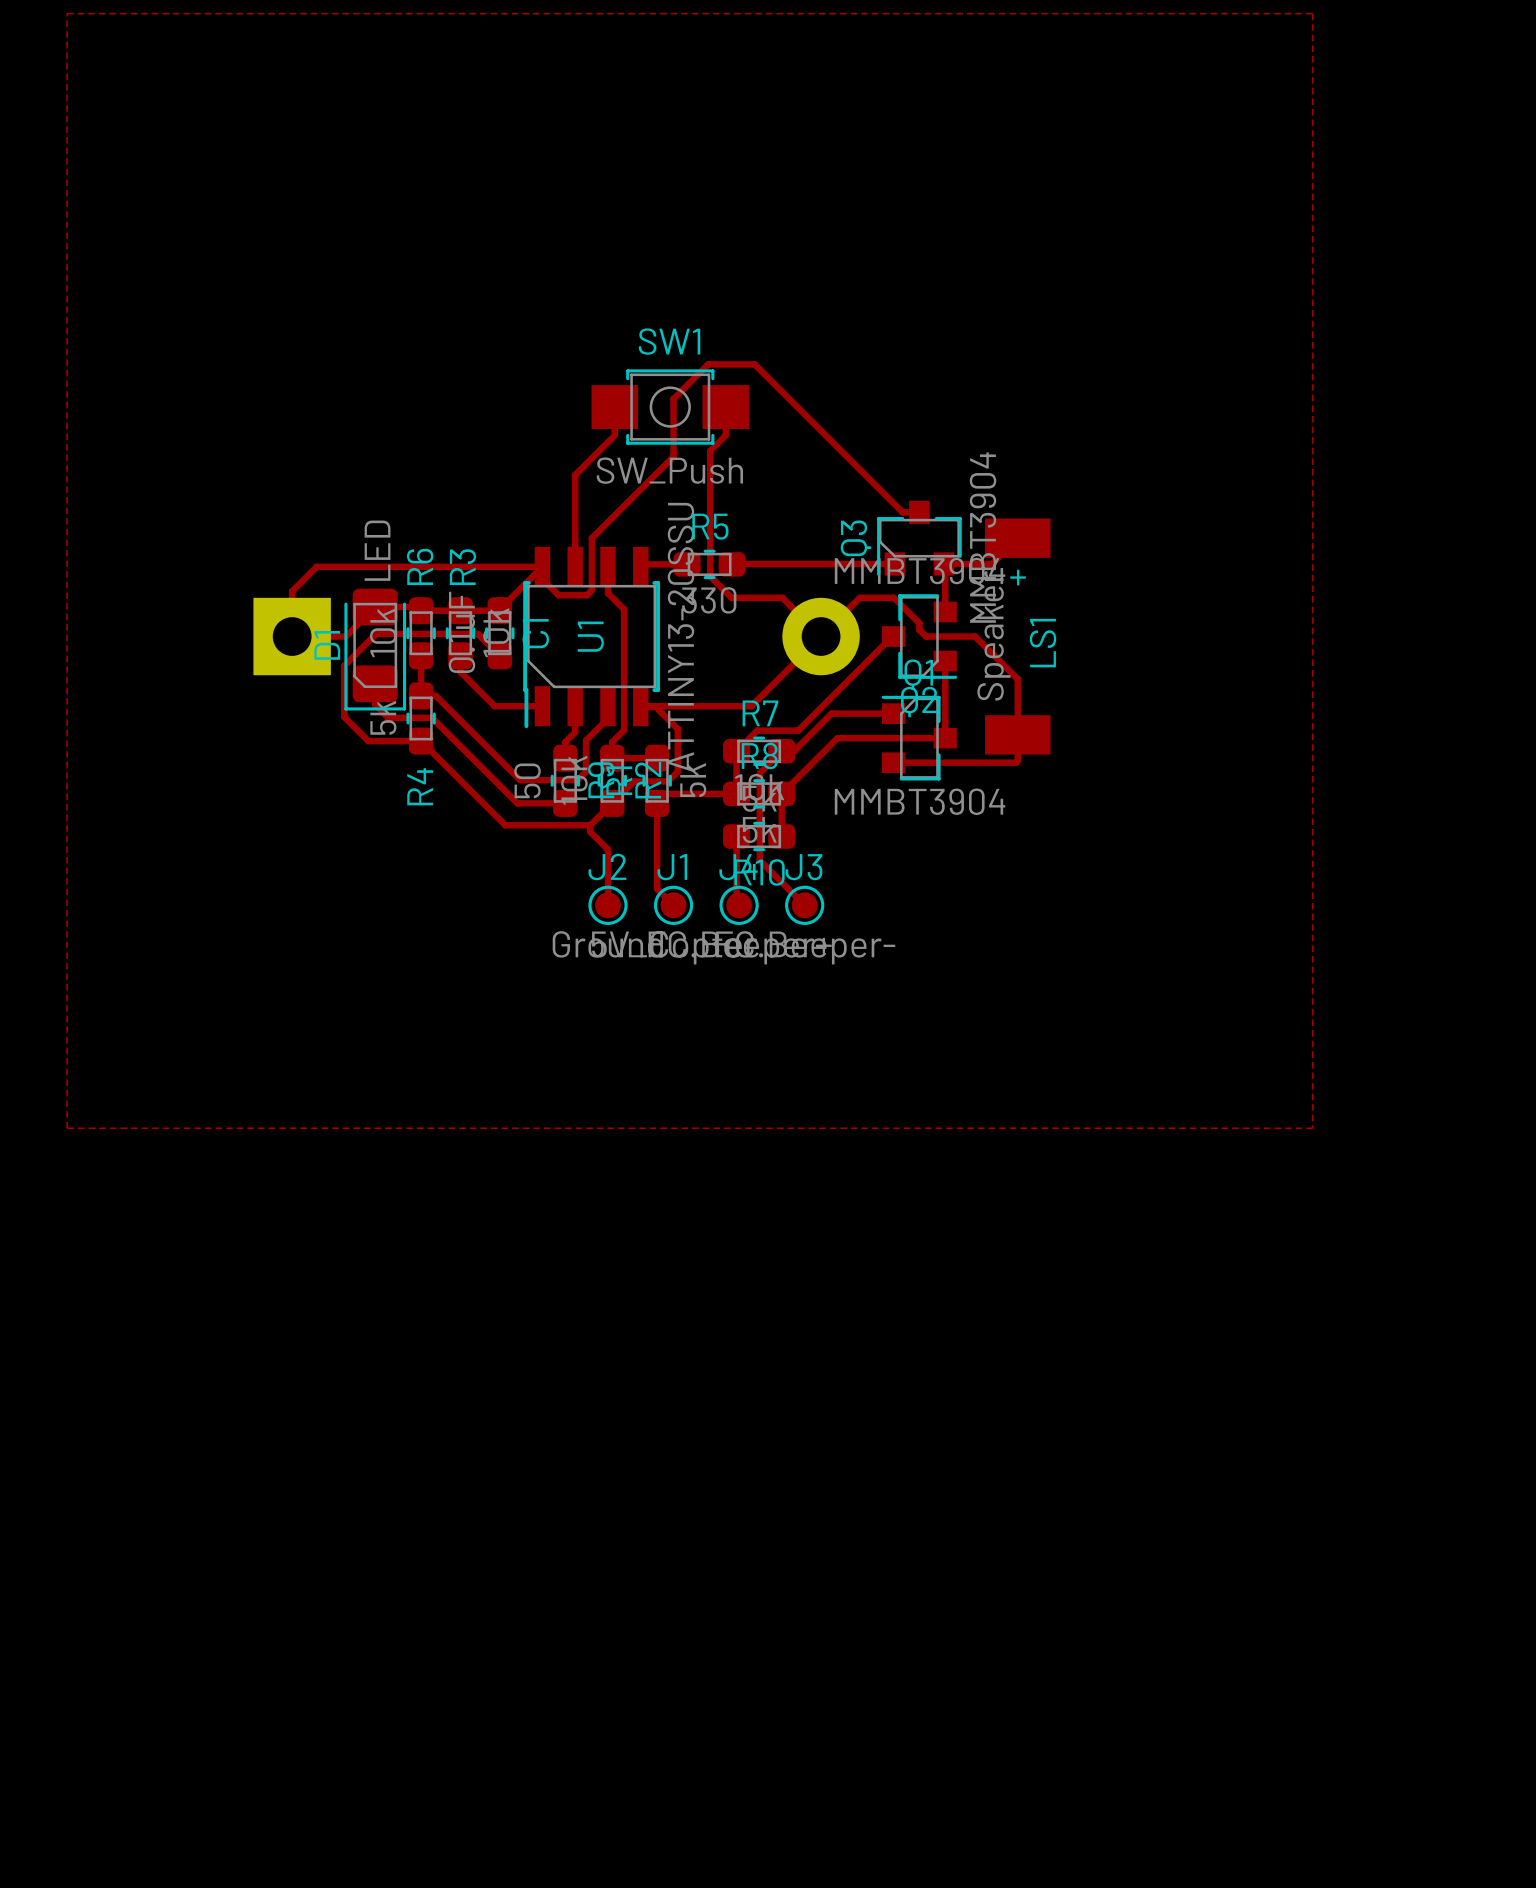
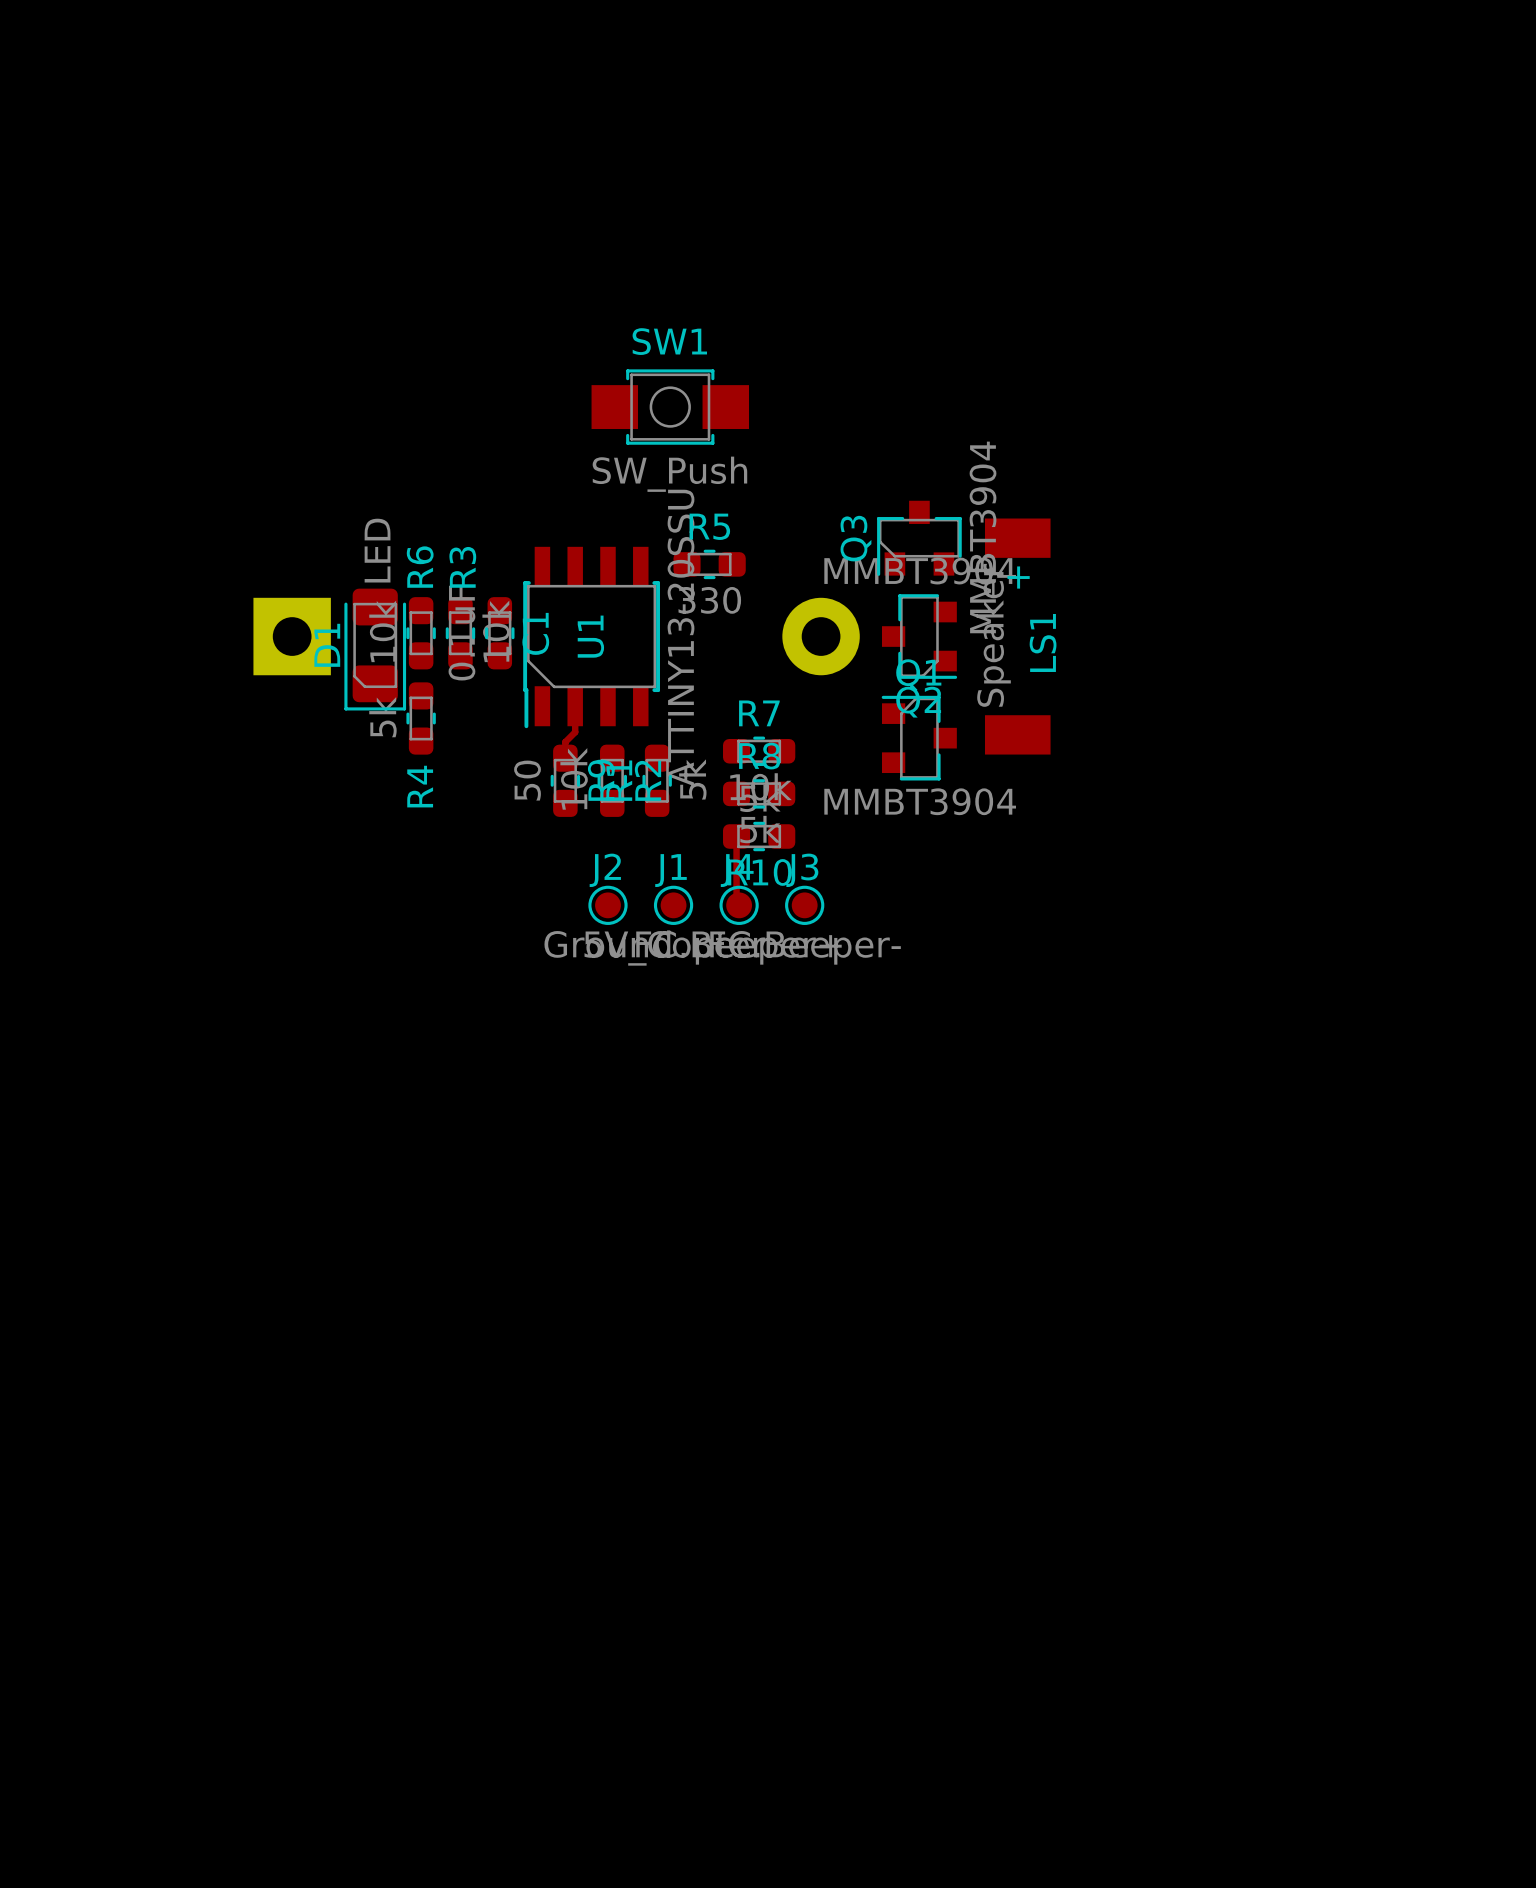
zone outline: (67, 13) (1312, 13) (1312, 1128) (67, 1128) (67, 13) -> none
track: (613, 407) (614, 435) (575, 475) (575, 566) -> none
track: (725, 407) (725, 435) (710, 450) (710, 576) (731, 597) (782, 597) (821, 636) -> none
track: (919, 512) (902, 512) (754, 364) (708, 364) (673, 399) (673, 456) (591, 538) (591, 590) (587, 595) (558, 595) (542, 579) (542, 566) -> none
track: (1017, 538) (991, 564) (943, 564) (945, 612) -> none
track: (687, 564) (643, 564) (640, 566) -> none
track: (894, 564) (732, 564) -> none
track: (542, 566) (316, 566) (292, 591) (292, 636) (345, 636) (375, 607) (417, 607) (421, 610) (499, 610) (542, 566) -> none
track: (607, 566) (607, 593) (624, 609) (624, 730) (612, 742) (612, 758) (657, 758) -> none
track: (893, 636) (798, 730) (757, 730) (736, 751) (736, 793) (666, 793) (657, 803) (657, 888) (673, 905) -> none
track: (421, 655) (421, 695) (435, 695) (520, 780) (577, 780) (586, 771) (586, 740) (607, 718) (607, 706) -> none
track: (460, 655) (460, 671) (494, 706) (542, 706) -> none
track: (499, 655) (477, 633) (376, 633) (344, 665) (344, 717) (368, 741) (421, 741) (505, 825) (590, 825) -> none
track: (945, 661) (945, 738) (837, 738) (781, 793) (781, 836) -> none
track: (375, 683) (375, 704) (388, 717) (431, 717) (517, 803) (565, 803) -> none
track: (640, 706) (751, 706) (859, 597) (893, 597) (919, 623) (919, 629) (925, 636) (975, 636) (1017, 679) (1017, 761) (1016, 762) (893, 762) -> none
track: (654, 706) (677, 729) (677, 771) (668, 781) (634, 781) (590, 825) -> none
track: (893, 713) (831, 713) (794, 751) (781, 751) (759, 773) (759, 860) (804, 905) -> none
track: (590, 825) (590, 831) (607, 849) (607, 905) -> none

